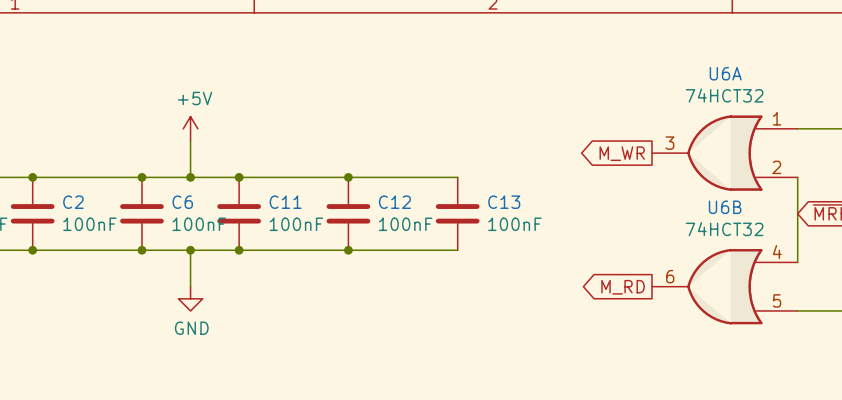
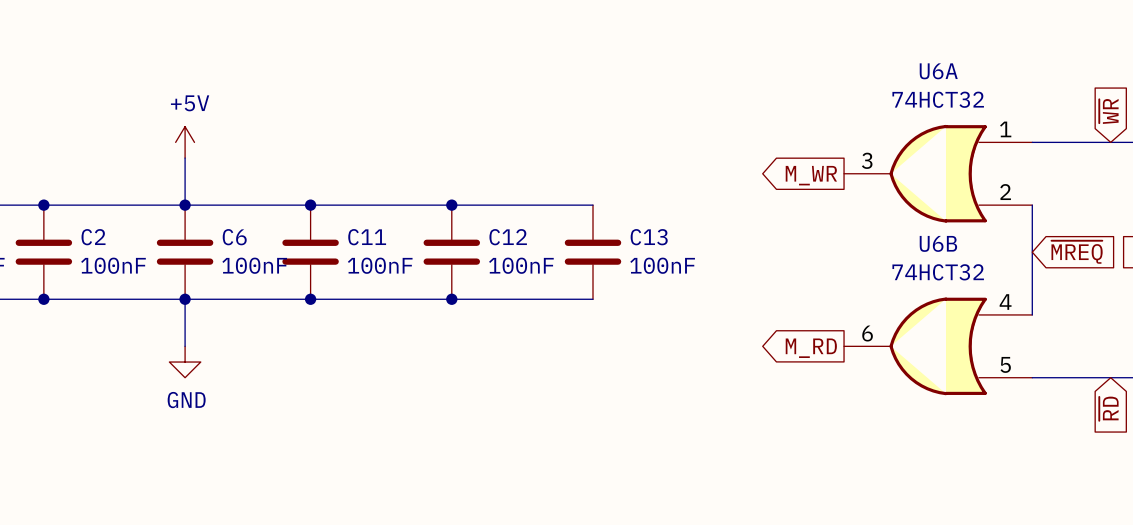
power symbol position: +5V (190, 128) -> +5V (185, 142)
wire: (190, 140) (190, 177) -> (185, 158) (185, 205)
junction: (190, 177) -> none
wire: (190, 250) (190, 286) -> (185, 299) (185, 346)
junction: (190, 250) -> none
power symbol position: GND (190, 298) -> GND (185, 362)

